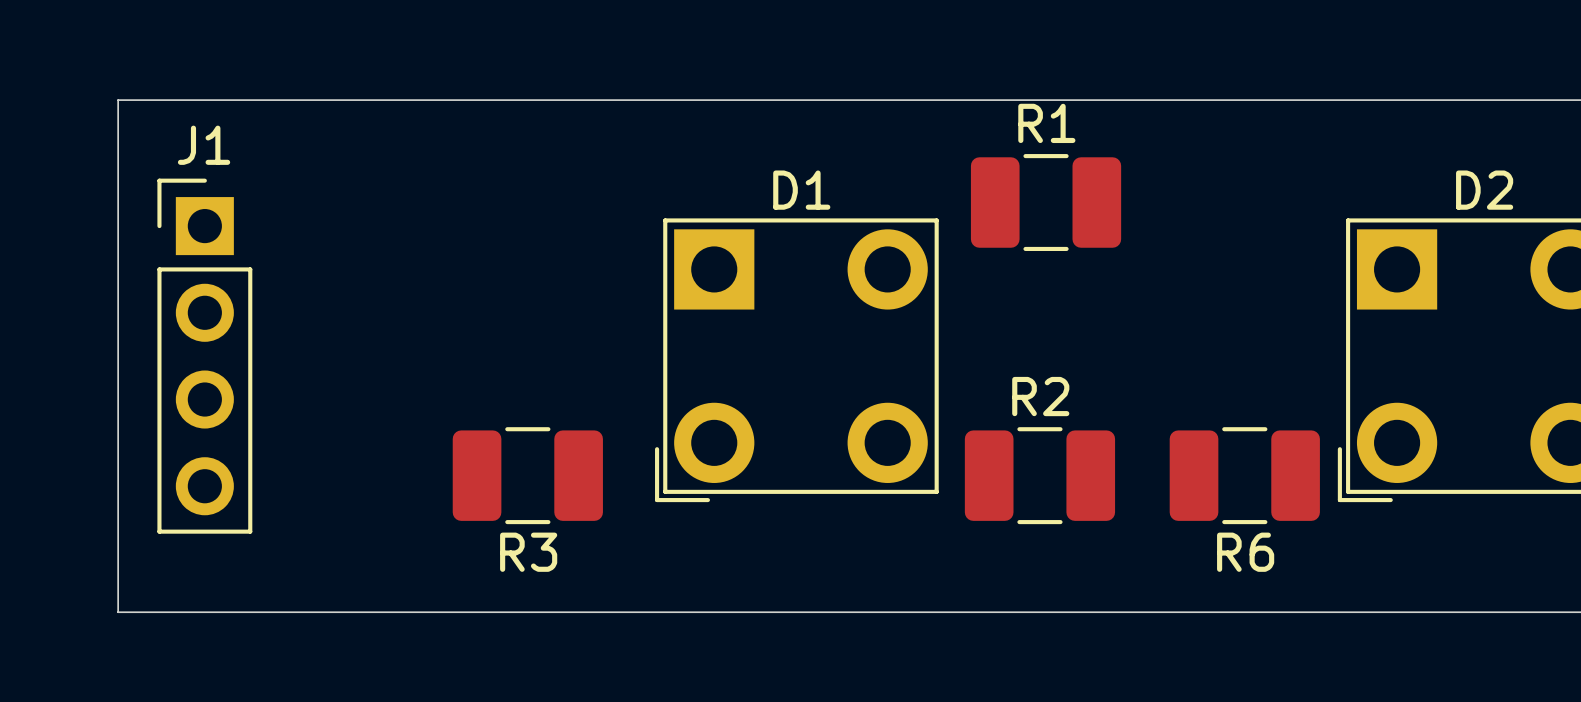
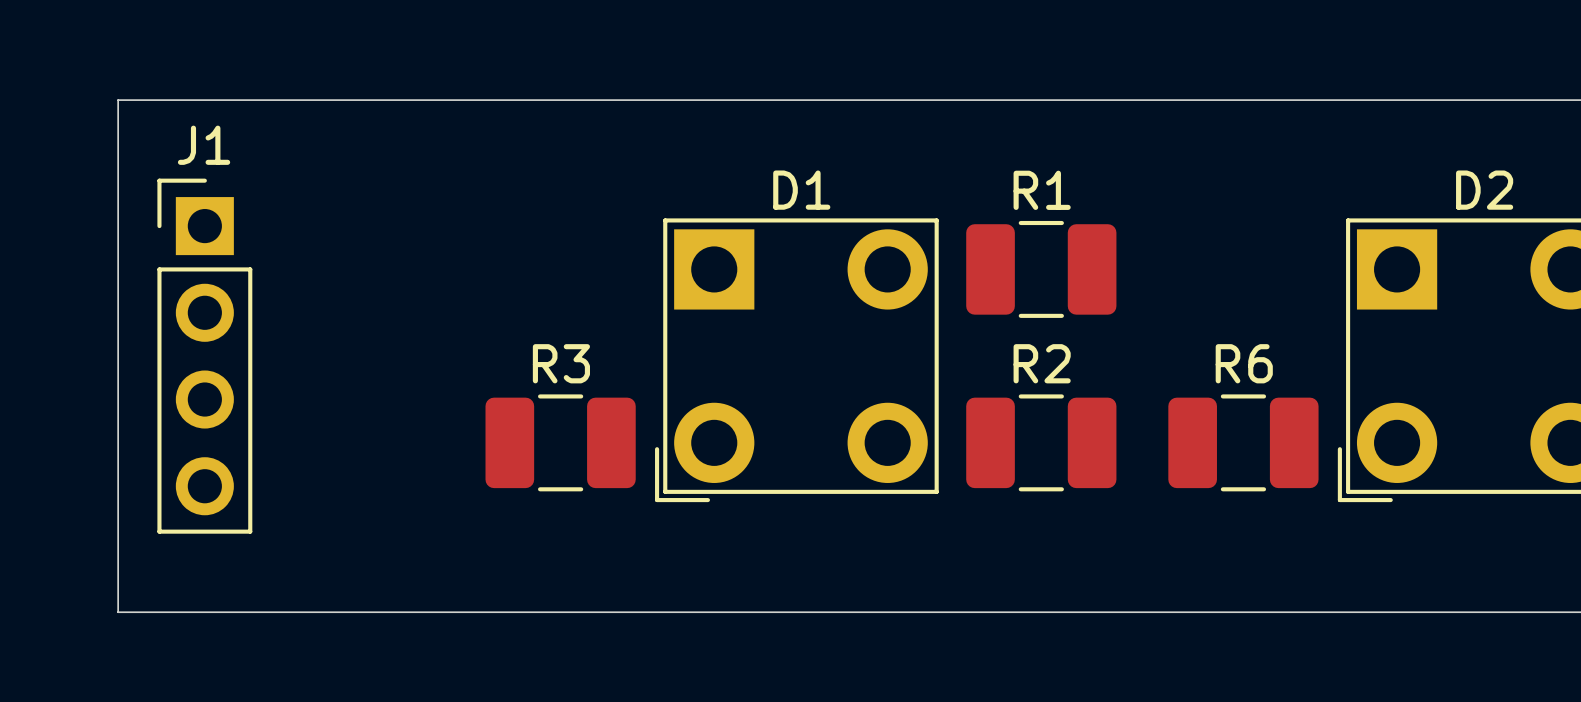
R1 position: (1046, 202) -> (1041, 269)
R3 position: (527, 475) -> (560, 442)
R2 position: (1039, 475) -> (1041, 442)
R6 position: (1244, 475) -> (1243, 442)
R3 name position: R3 (528, 552) -> R3 (561, 363)
R6 name position: R6 (1245, 552) -> R6 (1244, 363)

